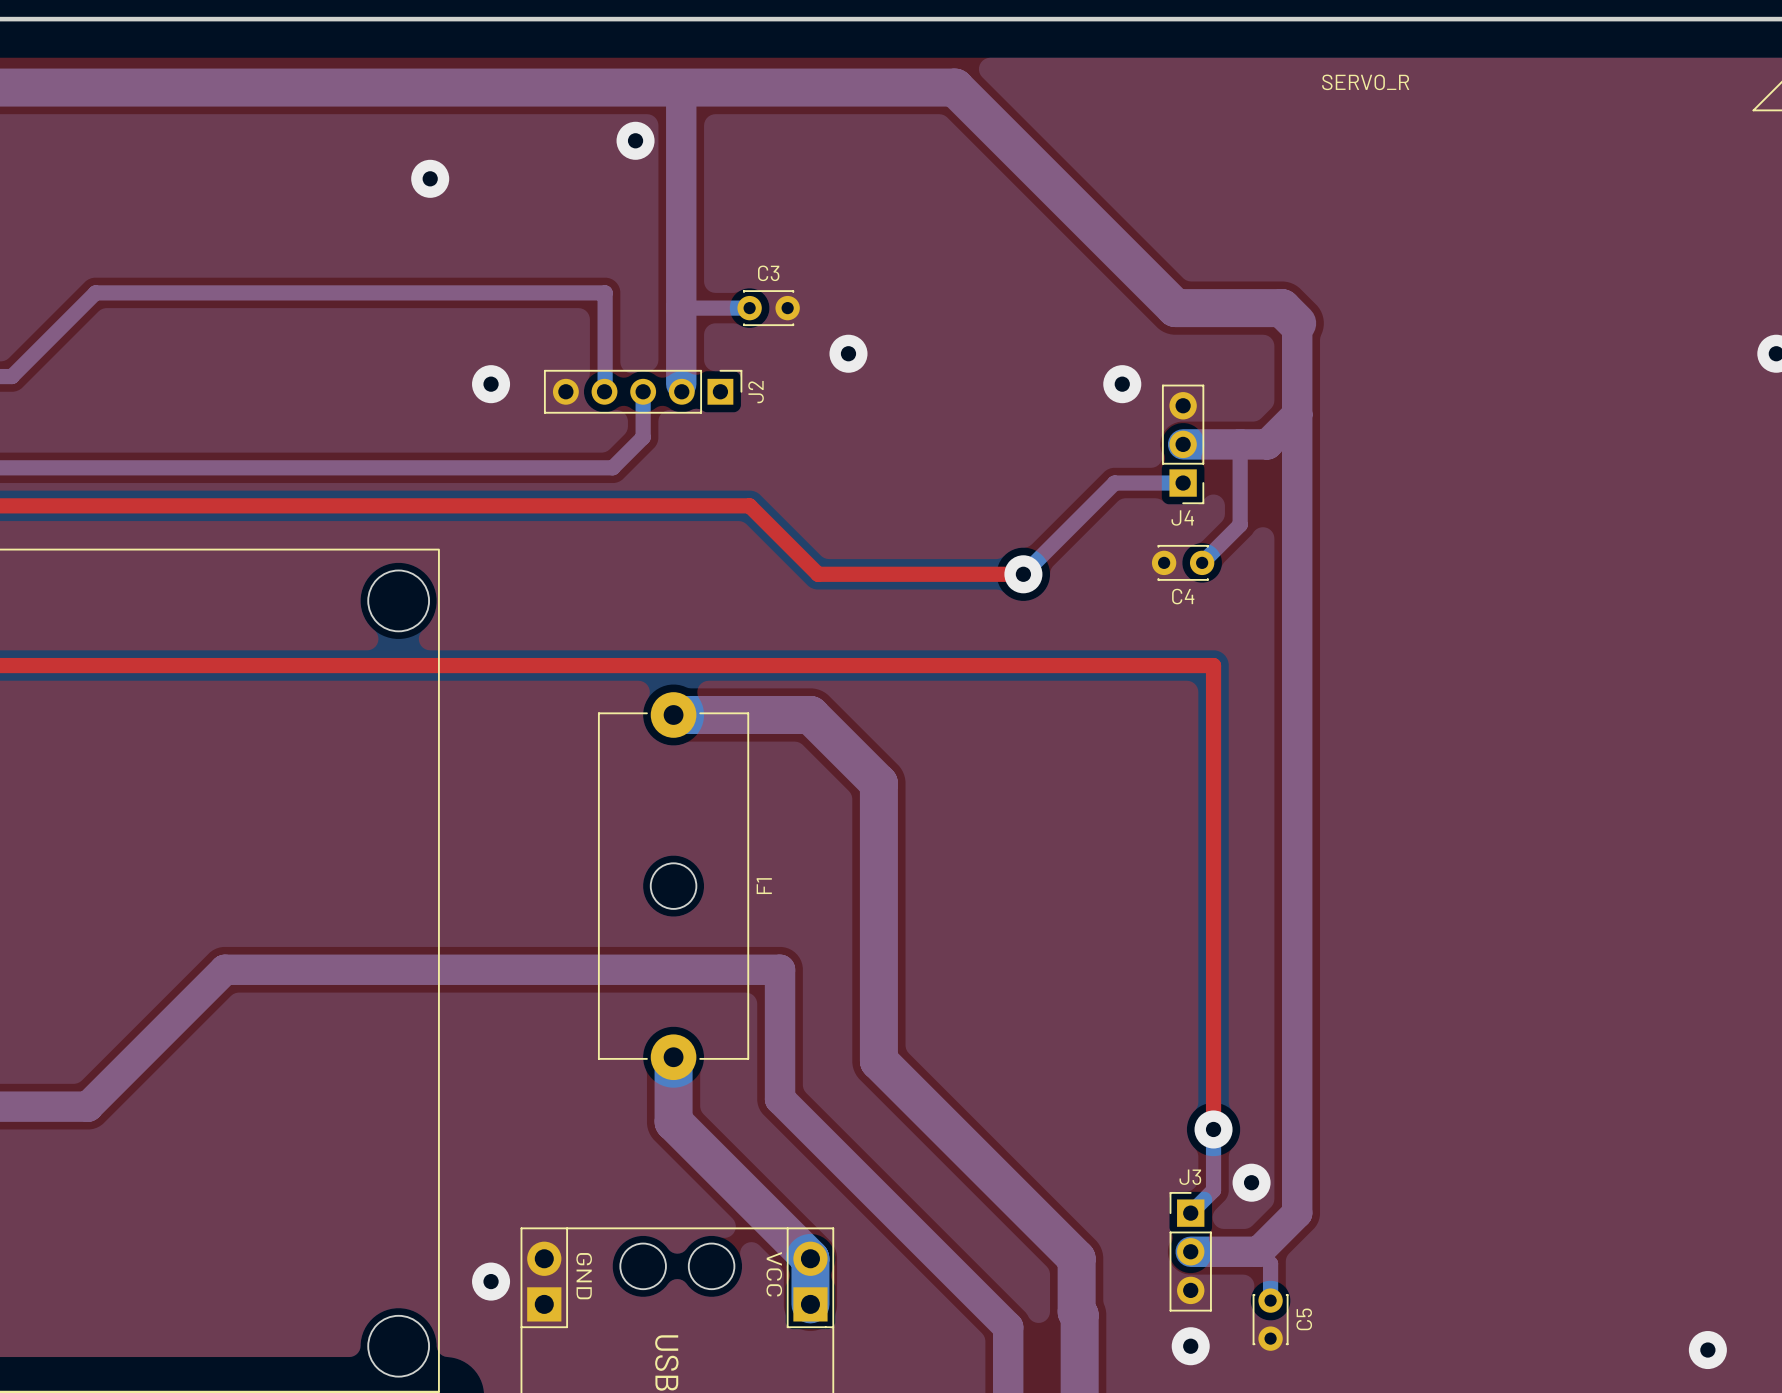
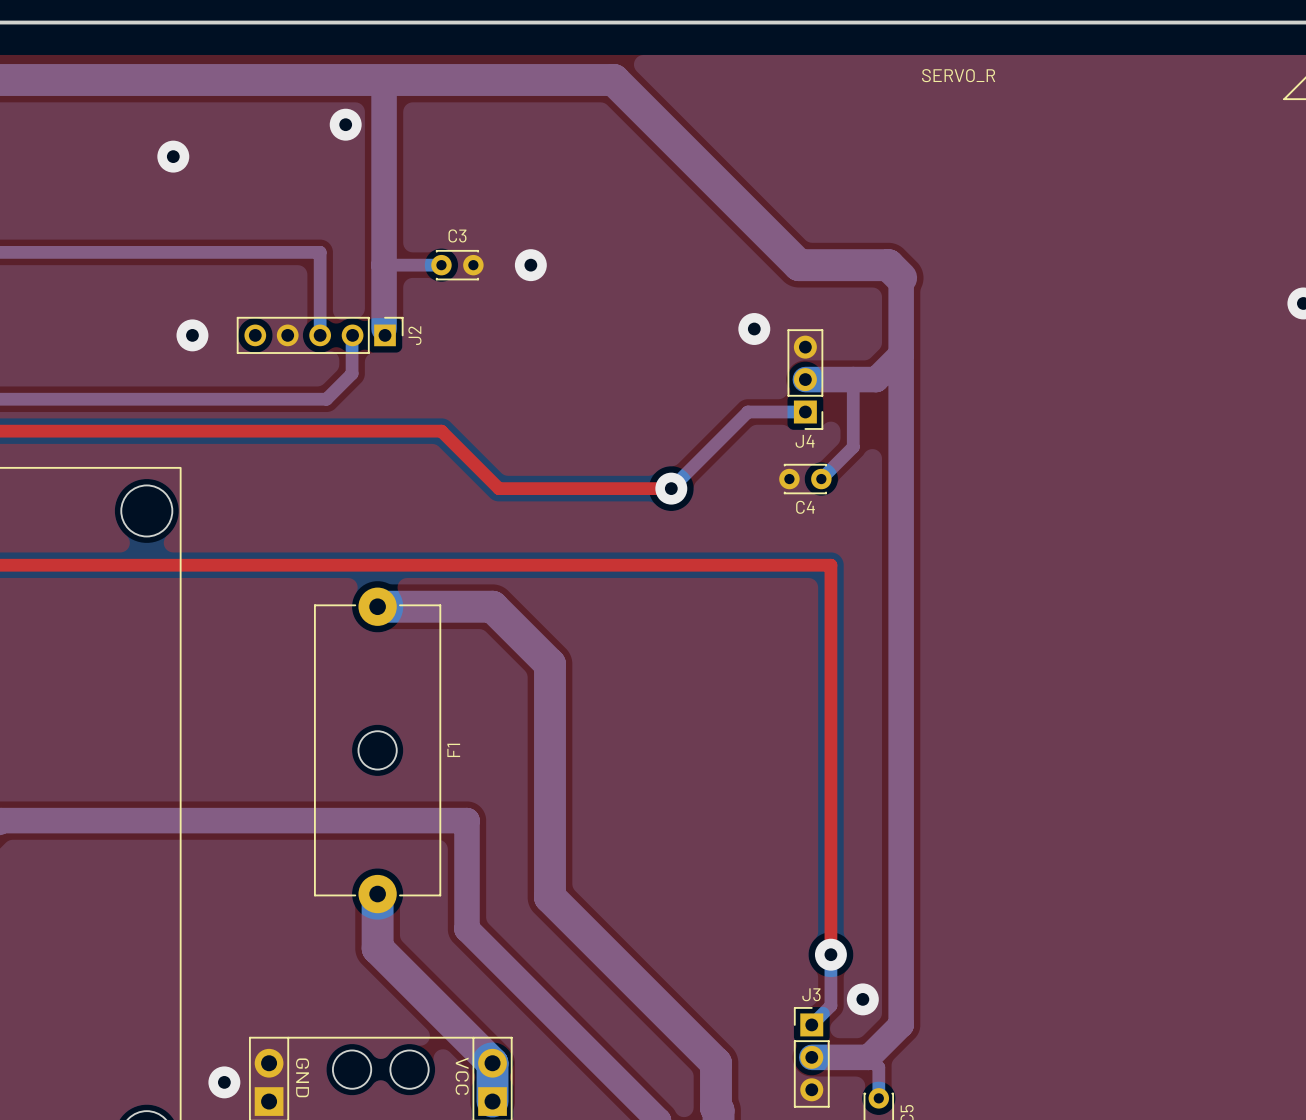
via position: (848, 353) -> (530, 265)
via position: (491, 384) -> (192, 335)
J2 position: (643, 391) -> (320, 335)

